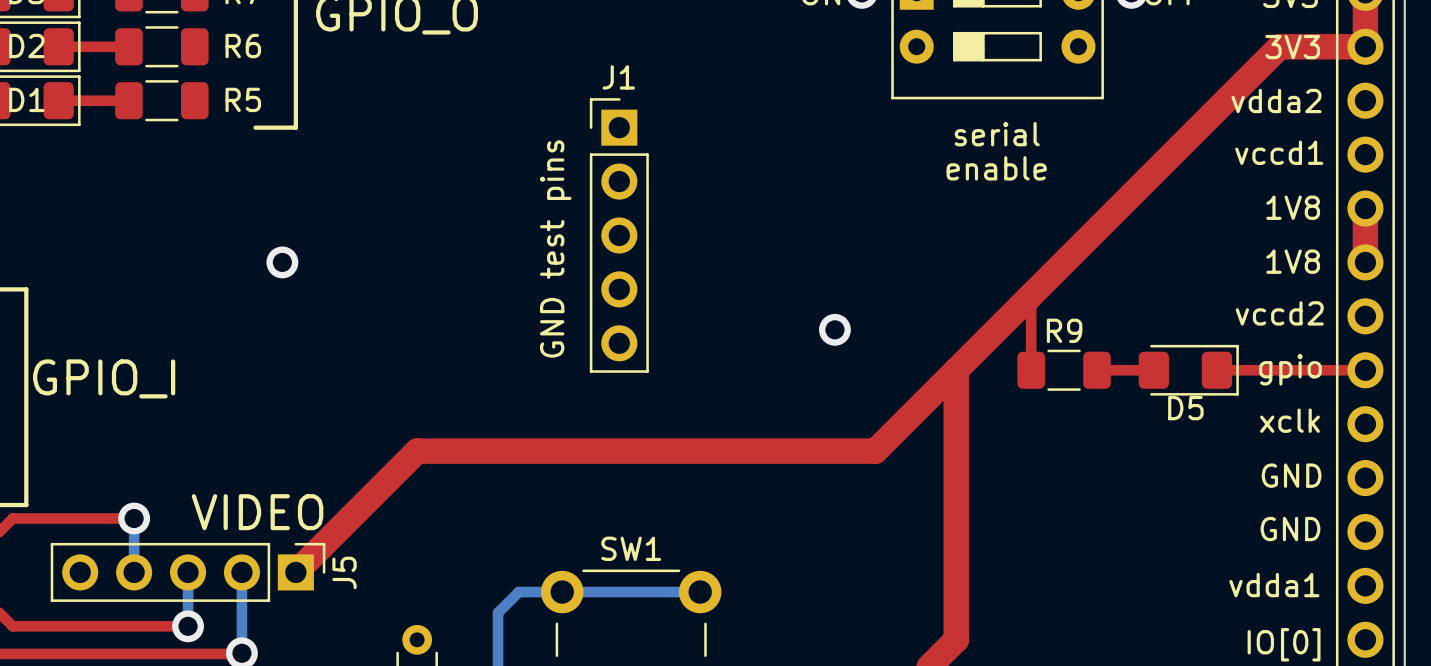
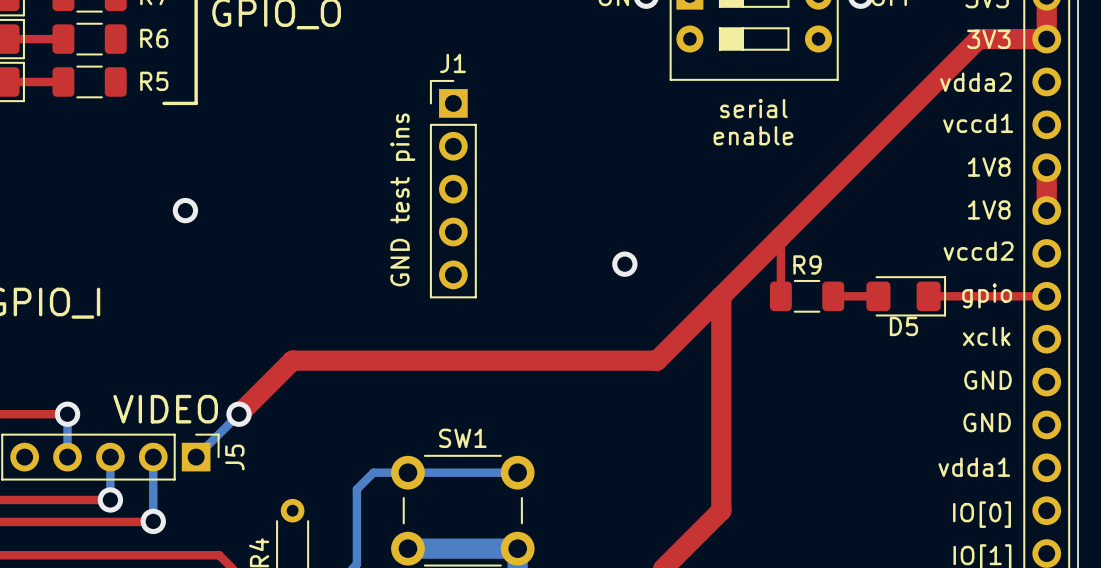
top track: (349, 518) (295, 572) -> none
bottom track: none -> (239, 414) (196, 457)
via: none -> (239, 414)

